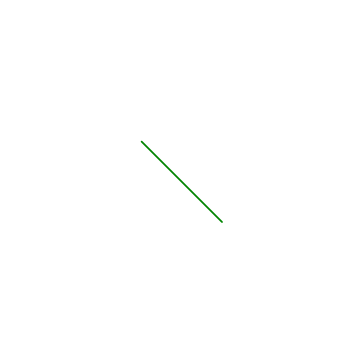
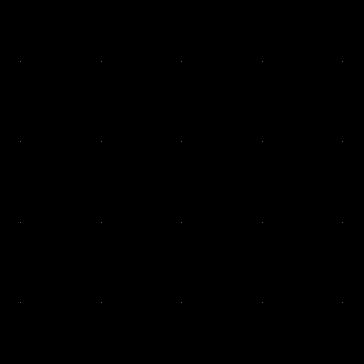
wire: (141, 141) (222, 222) -> none

